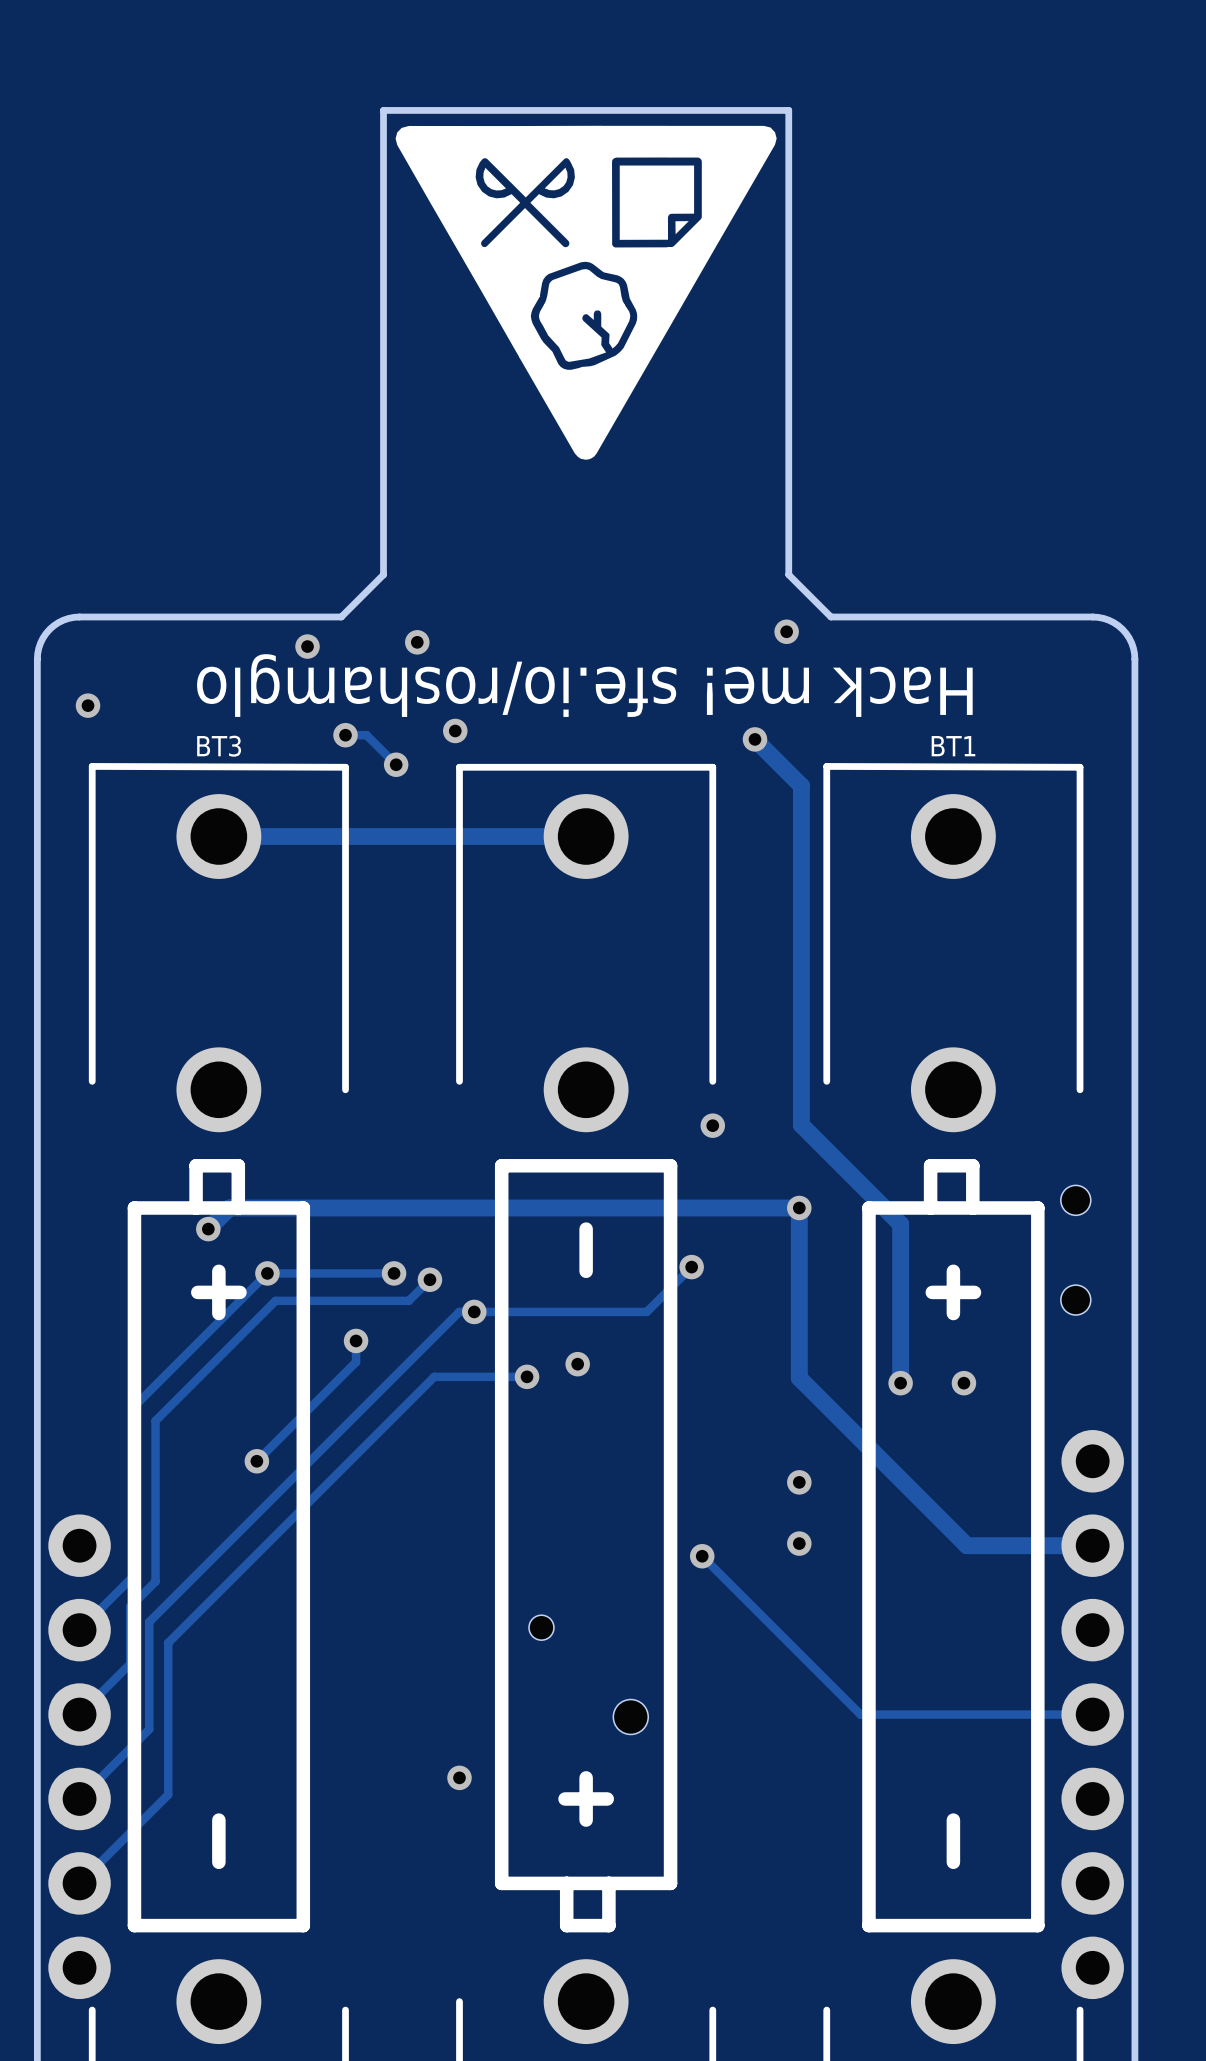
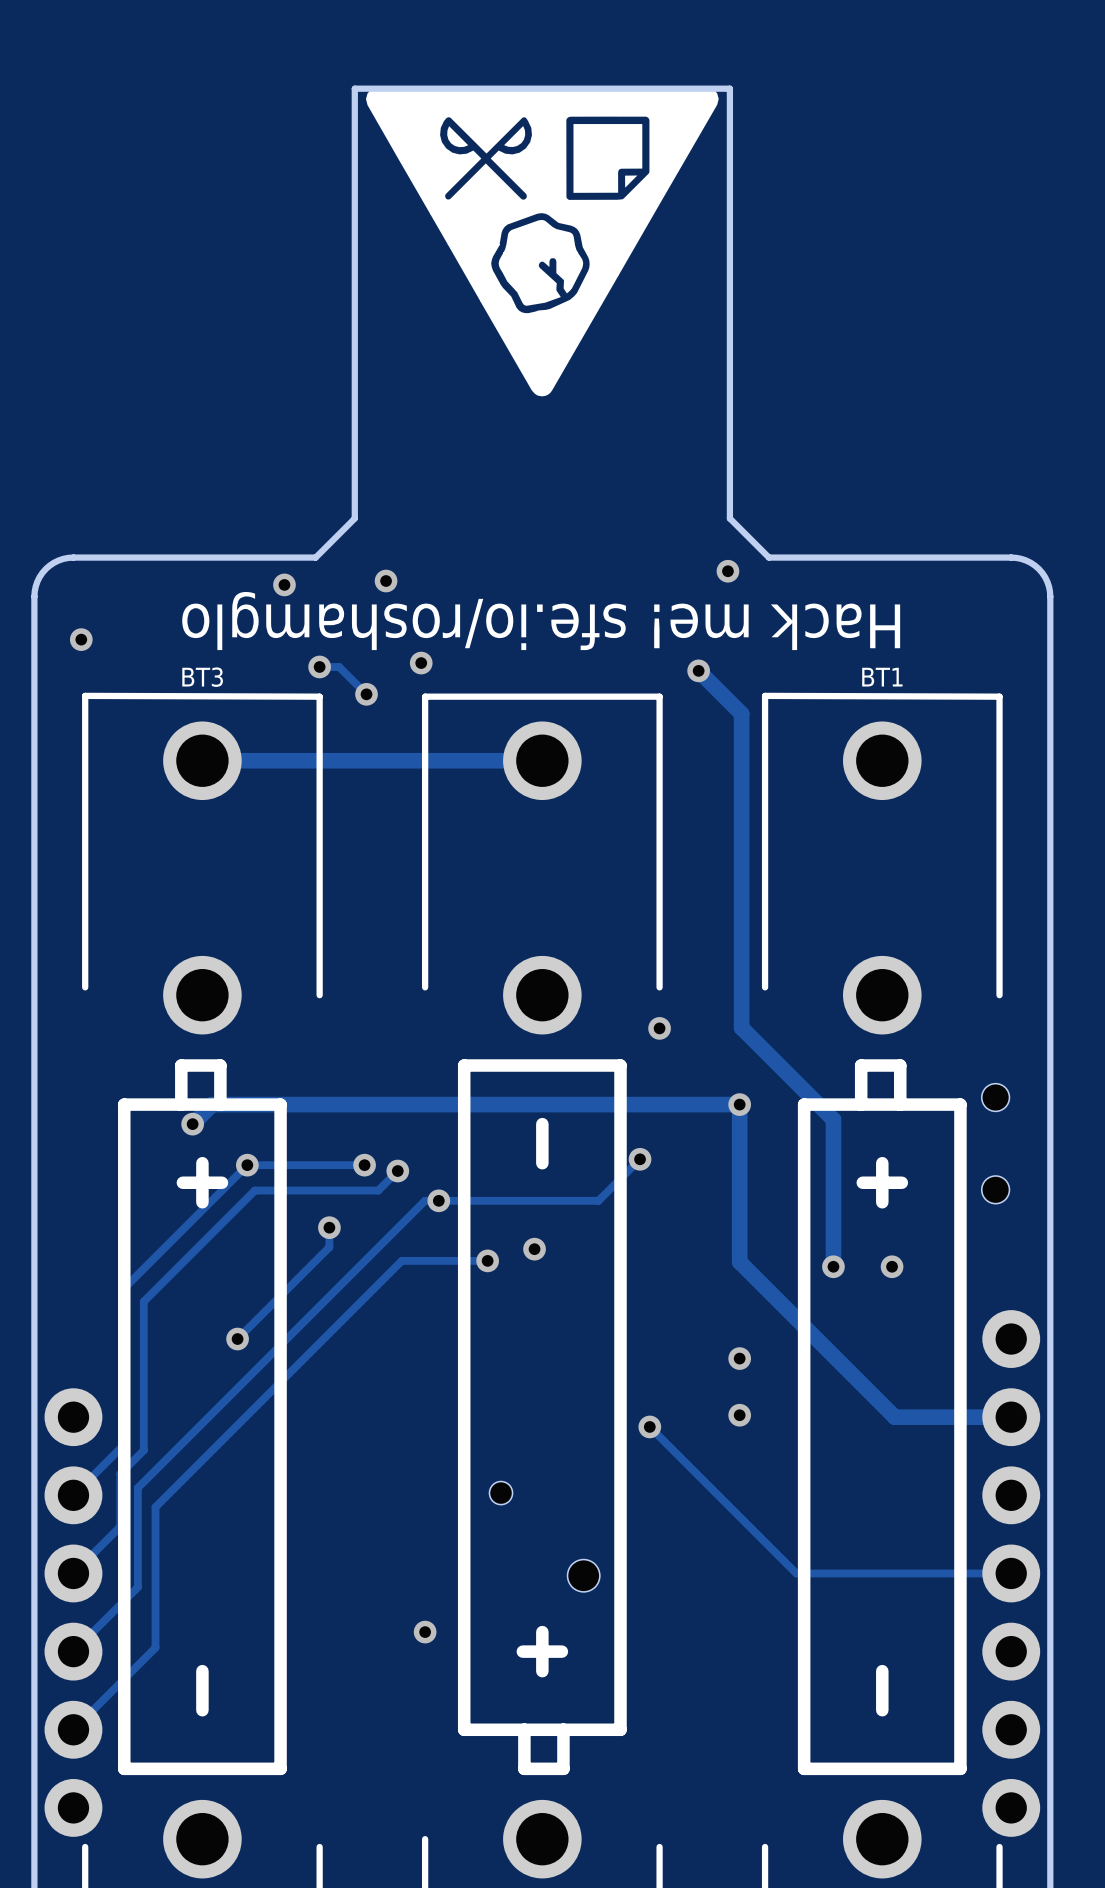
drawing position: (586, 292) -> (542, 241)

